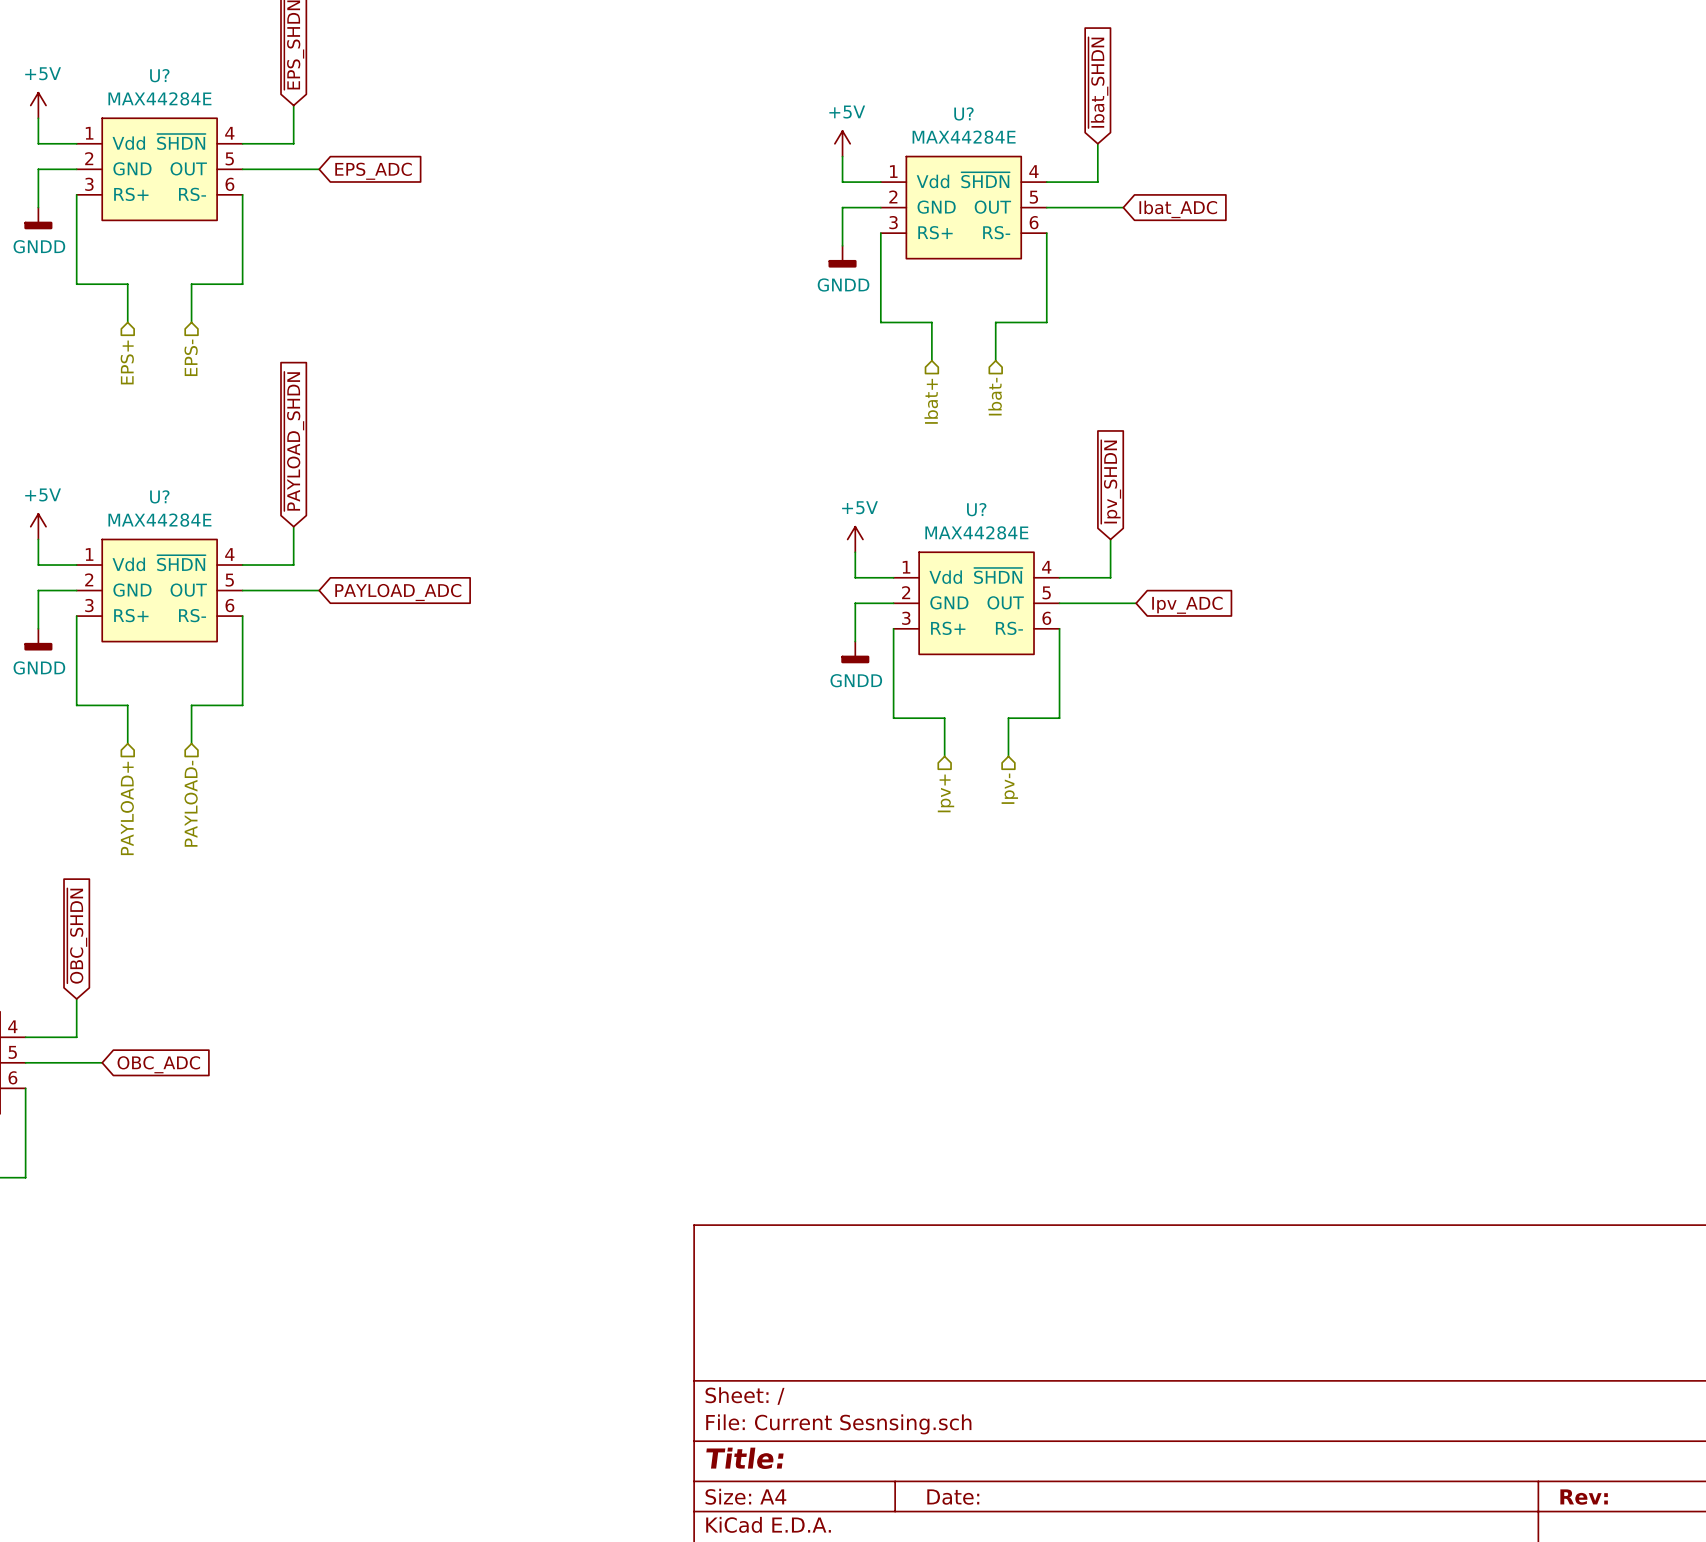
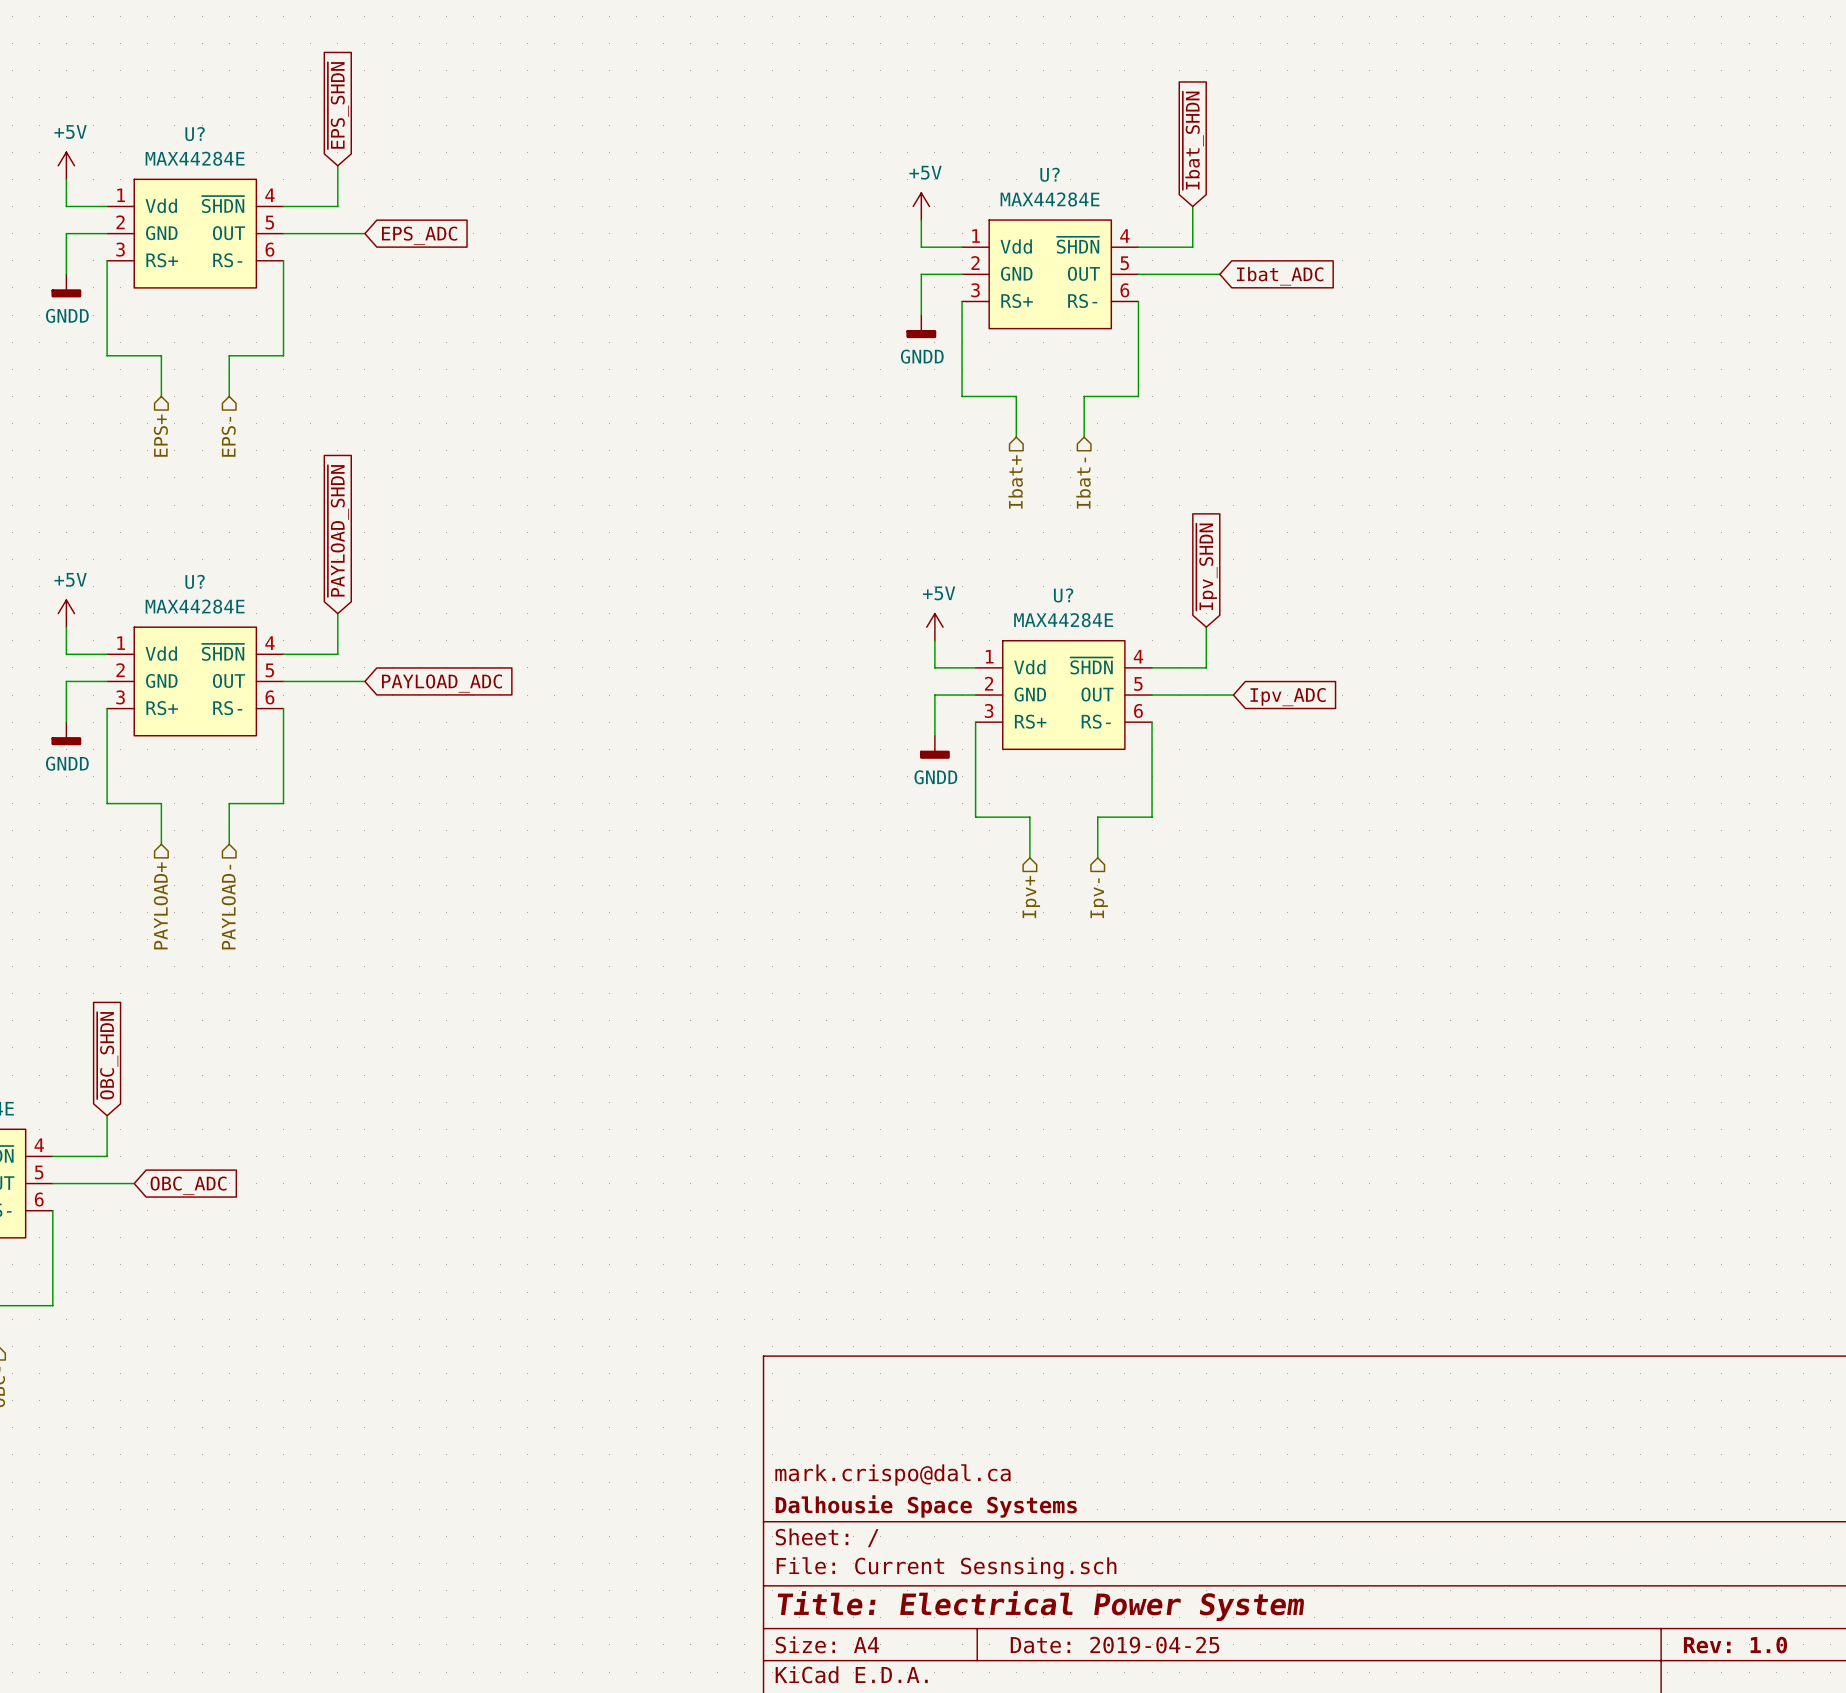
title block: none -> mark.crispo@dal.ca (892, 1474)
title block: none -> Dalhousie Space Systems (926, 1506)
title block: Title: (744, 1458) -> Title: Electrical Power System (1040, 1606)
title block: Date: (953, 1497) -> Date: 2019-04-25 (1115, 1645)
title block: Rev: (1584, 1497) -> Rev: 1.0 (1735, 1645)

